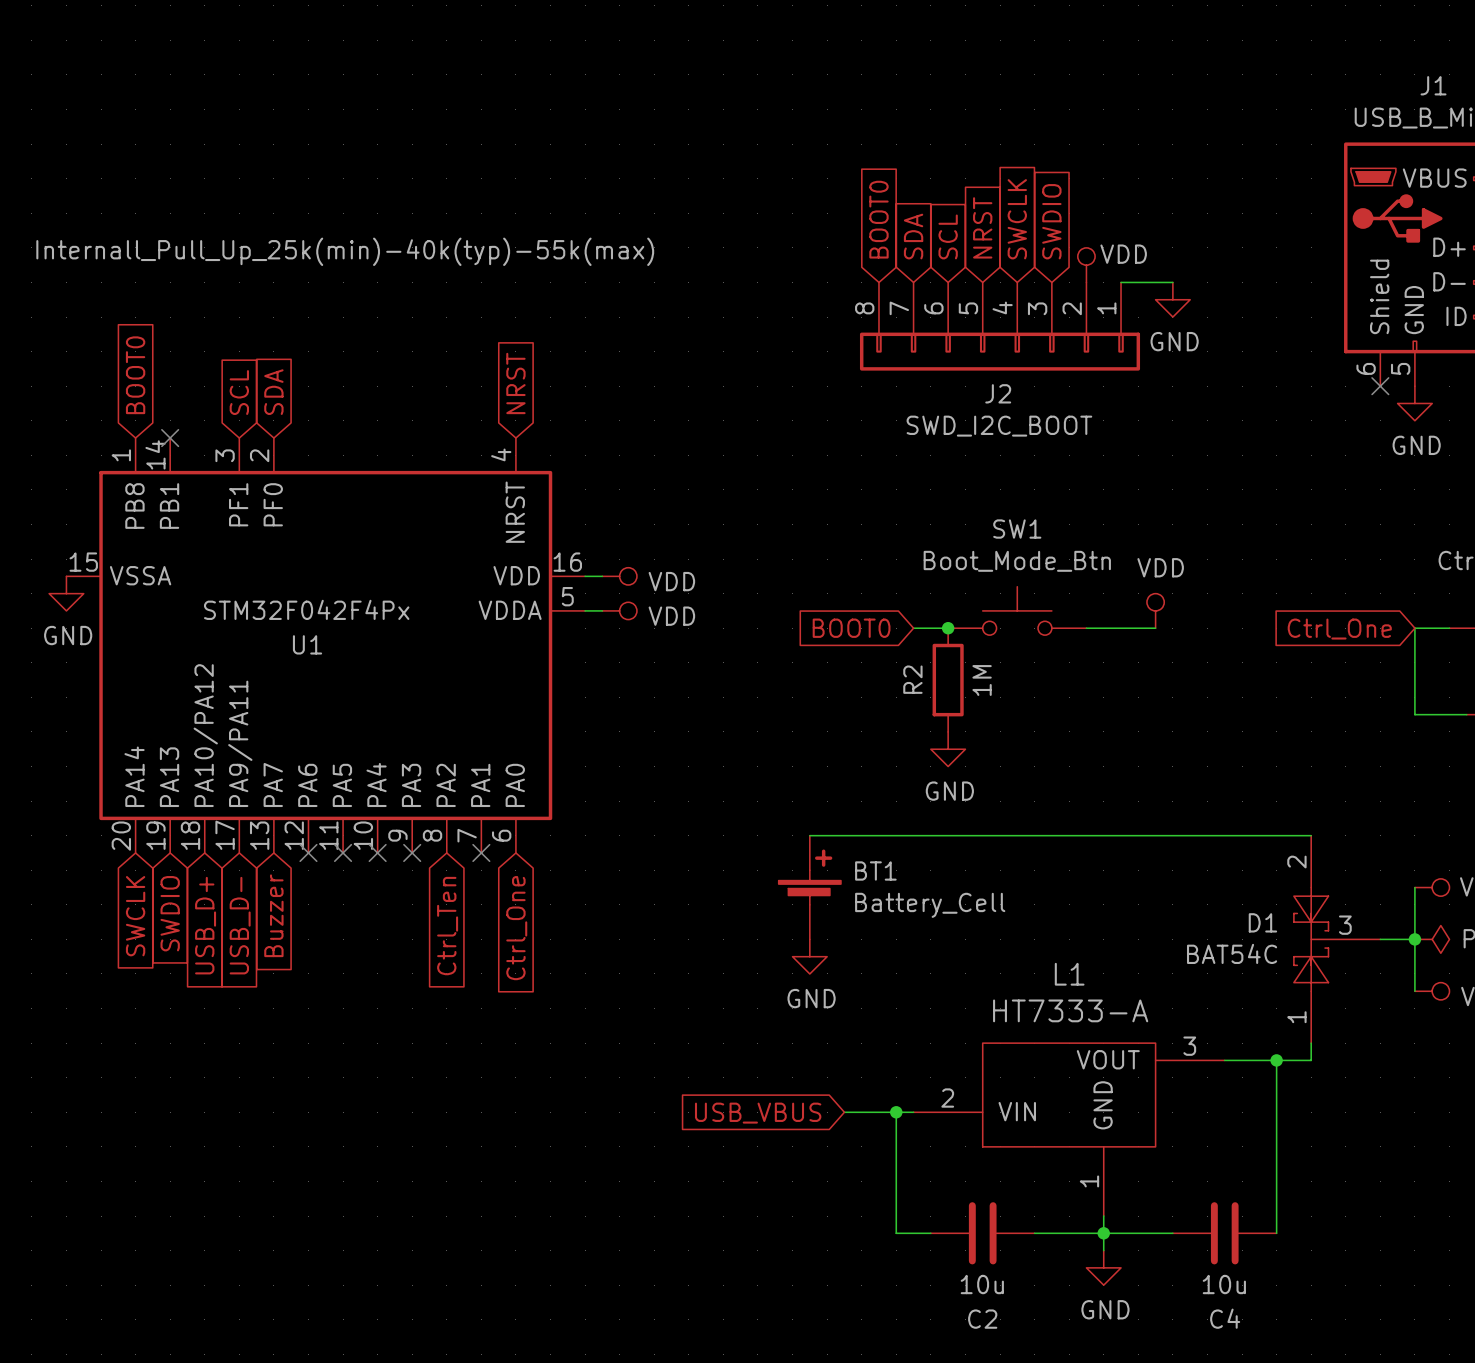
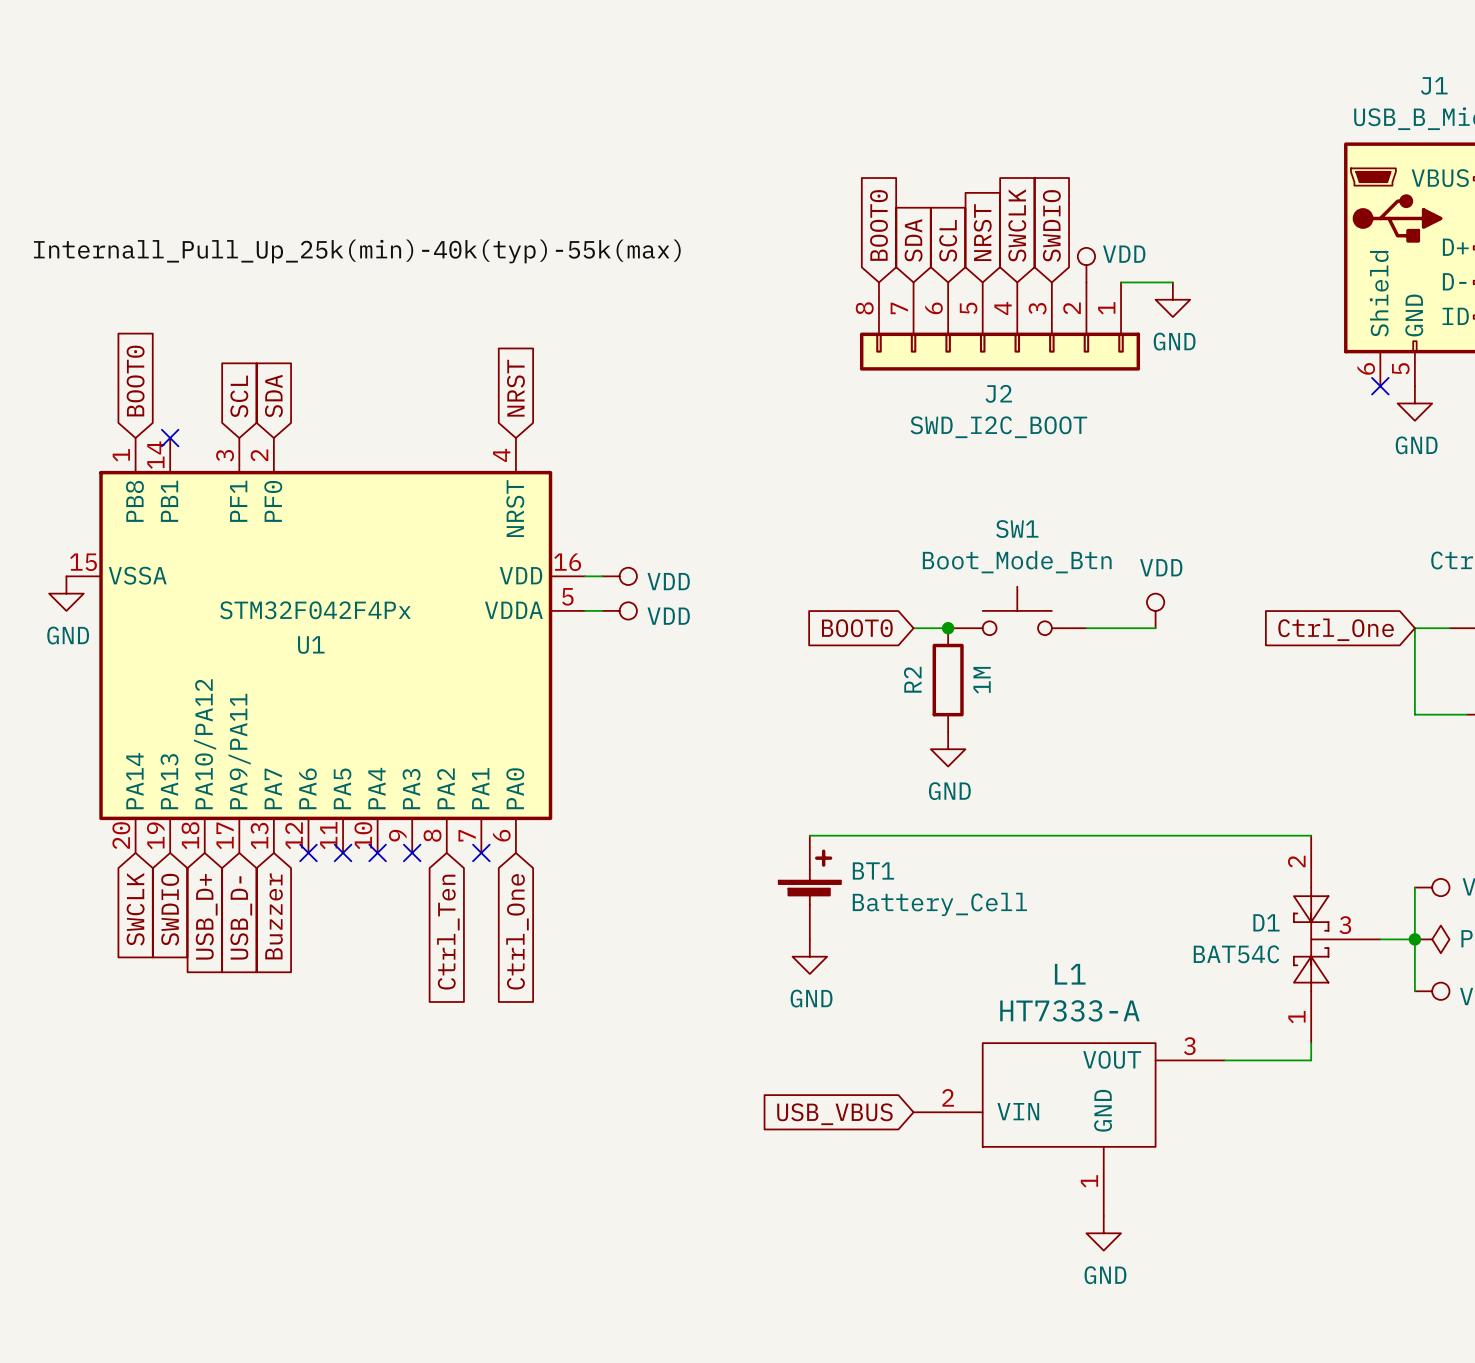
wire: (1276, 1060) (1276, 1233) -> none
junction: (1276, 1060) -> none
wire: (844, 1112) (913, 1112) -> none
wire: (896, 1112) (896, 1233) (930, 1233) -> none
junction: (896, 1112) -> none
global label position: USB_VBUS (758, 1113) -> USB_VBUS (834, 1114)
C2: 10u (982, 1233) -> none
wire: (1034, 1233) (1172, 1233) -> none
junction: (1103, 1233) -> none
C4: 10u (1224, 1233) -> none
power symbol position: GND (1103, 1267) -> GND (1103, 1233)

